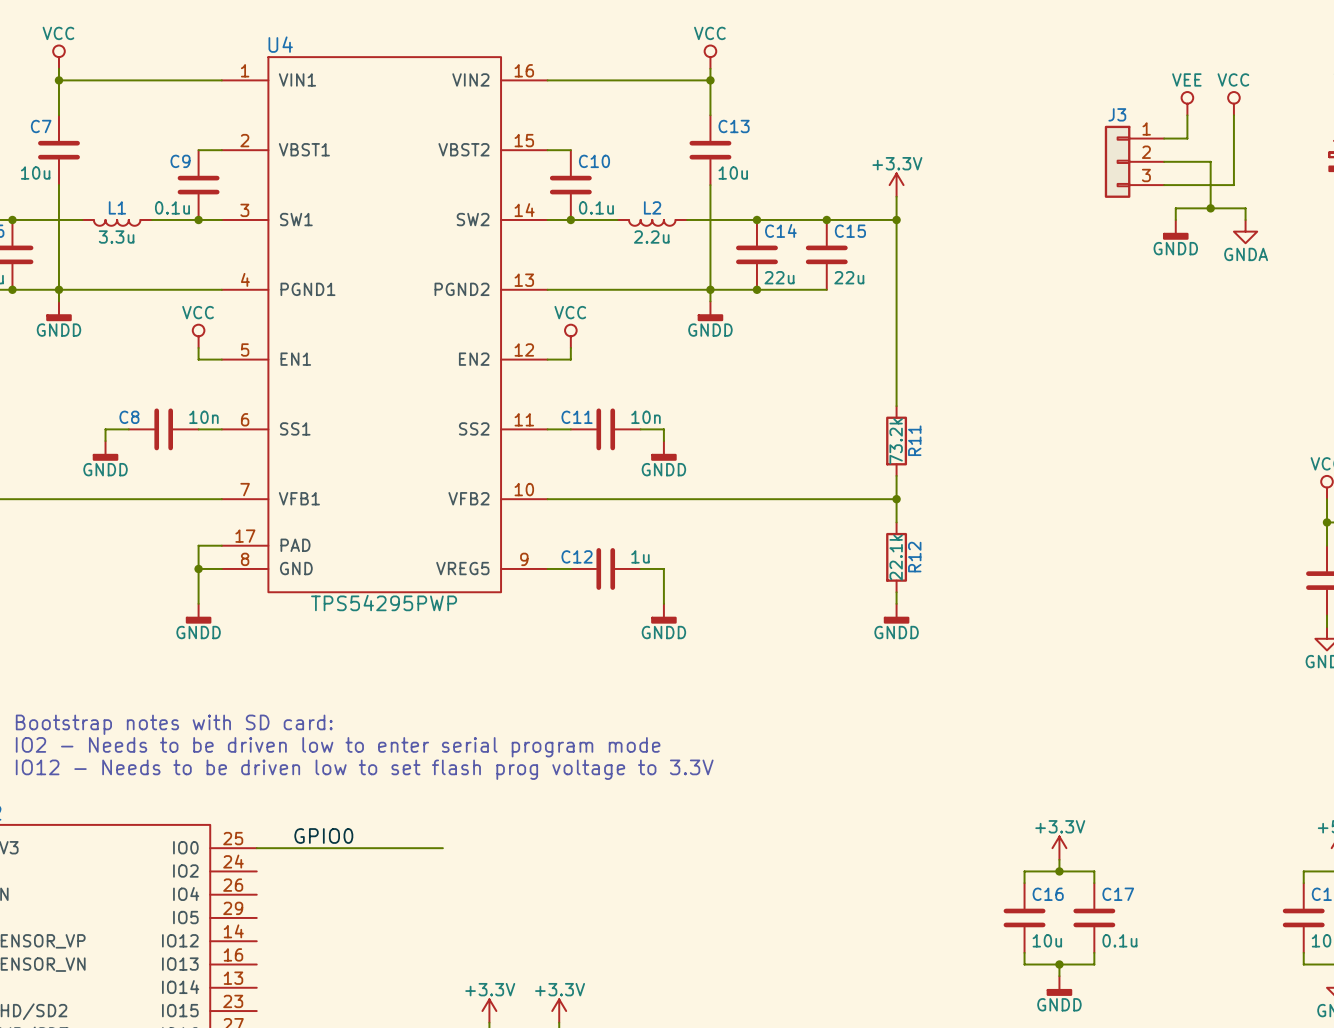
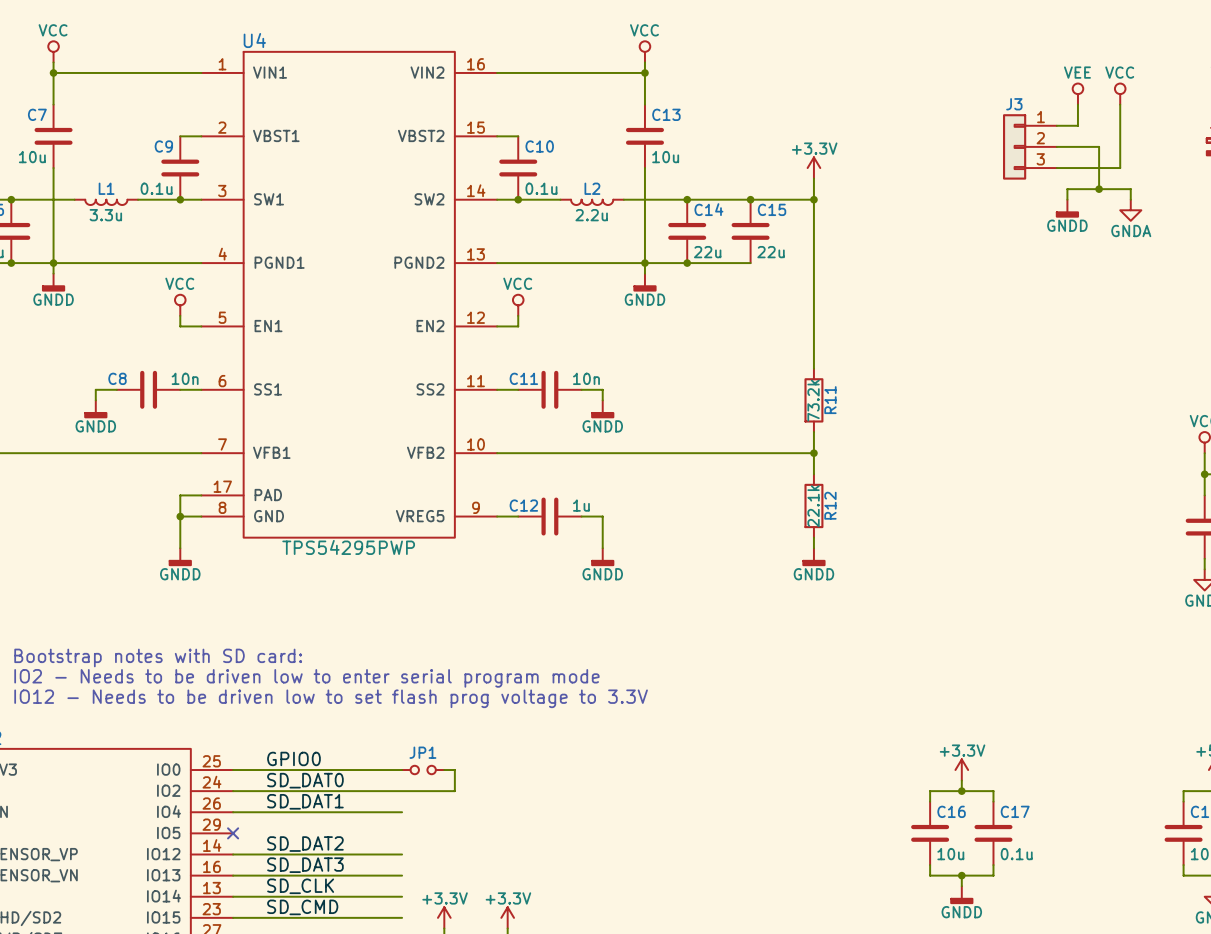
JP1: none -> (423, 770)
wire: none -> (444, 770) (454, 770) (454, 791) (233, 791)
label: none -> SD_DAT0 (305, 780)
label: none -> SD_DAT1 (305, 801)
wire: none -> (233, 812) (402, 812)
no-connect mark: none -> (233, 833)
label: none -> SD_DAT2 (305, 844)
wire: none -> (233, 854) (402, 854)
label: none -> SD_DAT3 (305, 865)
wire: none -> (233, 875) (402, 875)
label: none -> SD_CLK (300, 886)
wire: none -> (233, 896) (402, 896)
label: none -> SD_CMD (302, 907)
wire: none -> (233, 917) (402, 917)

